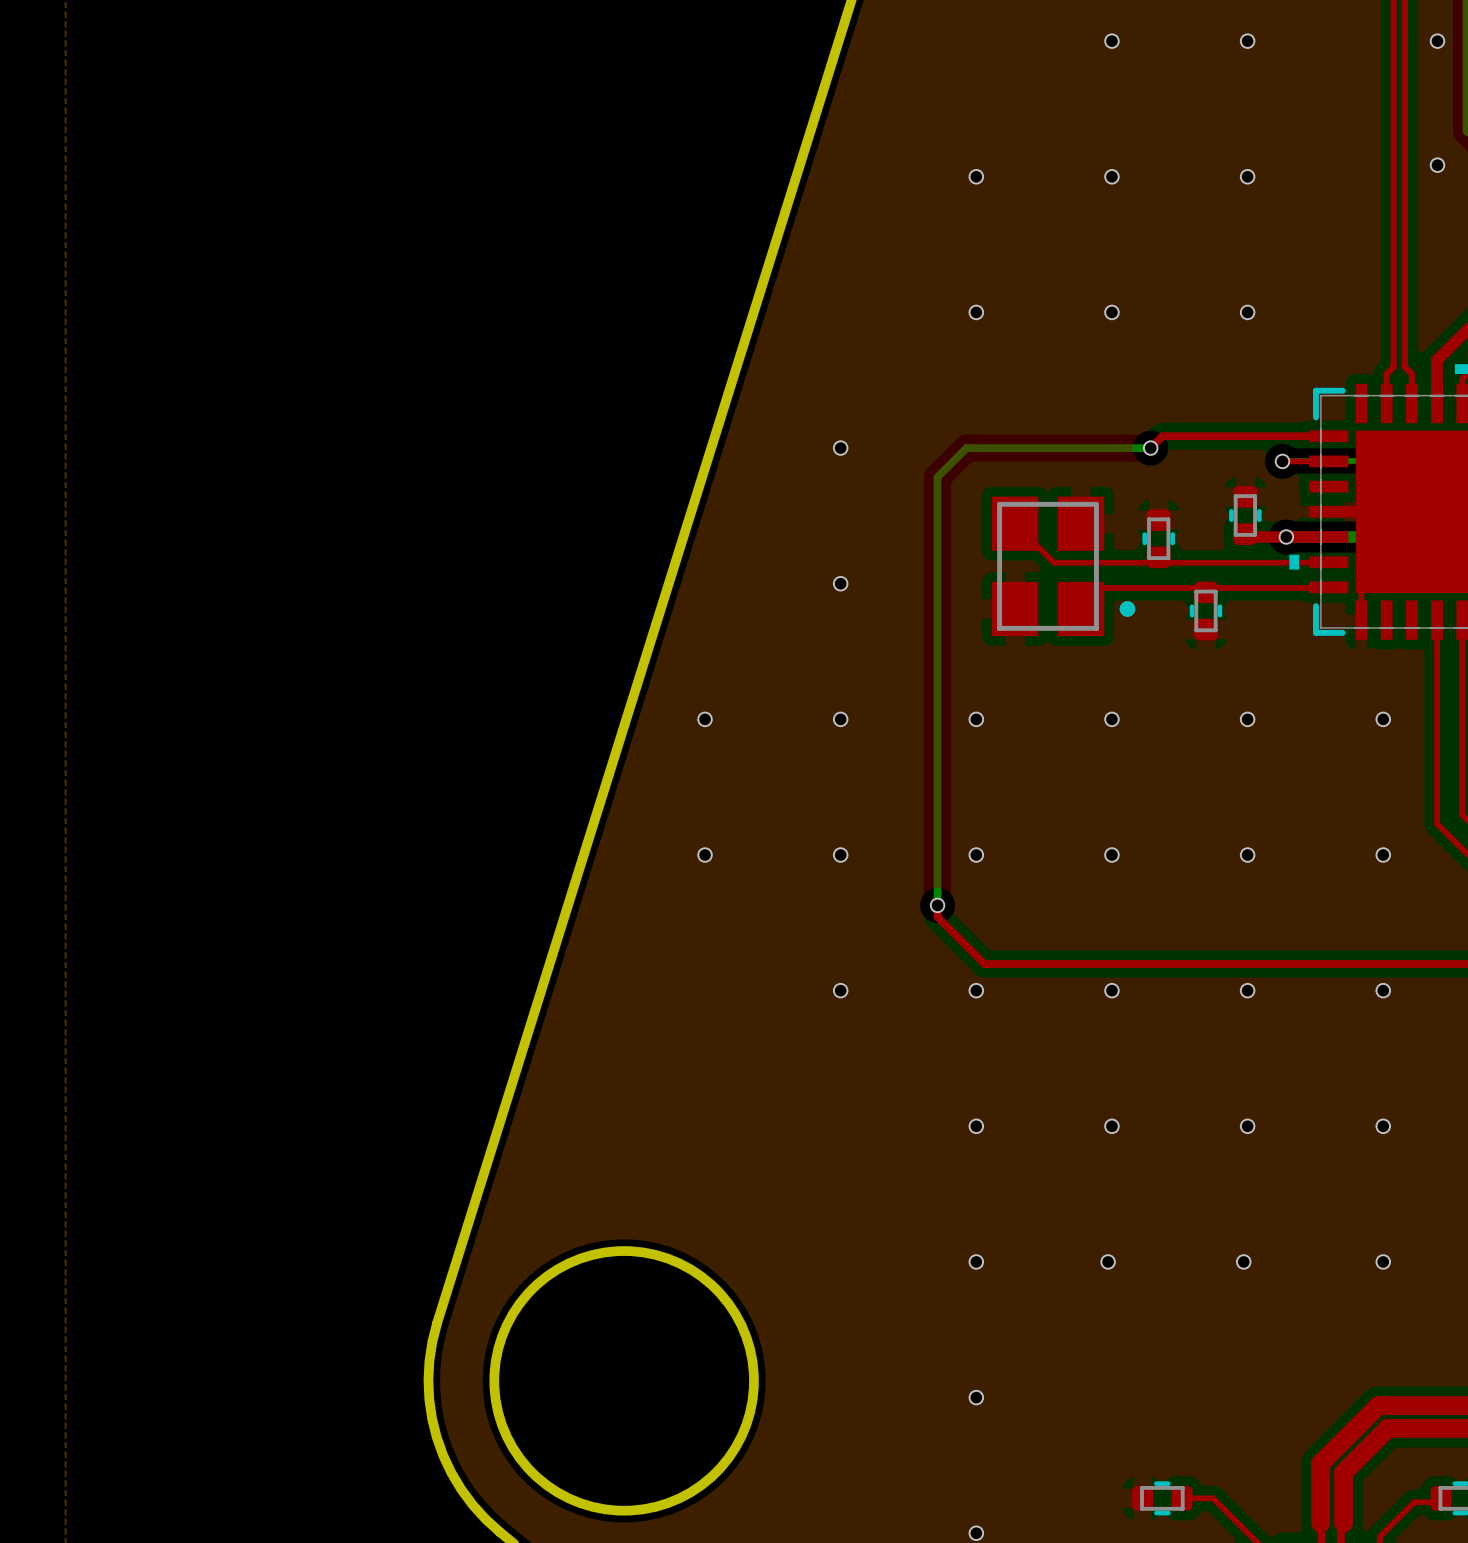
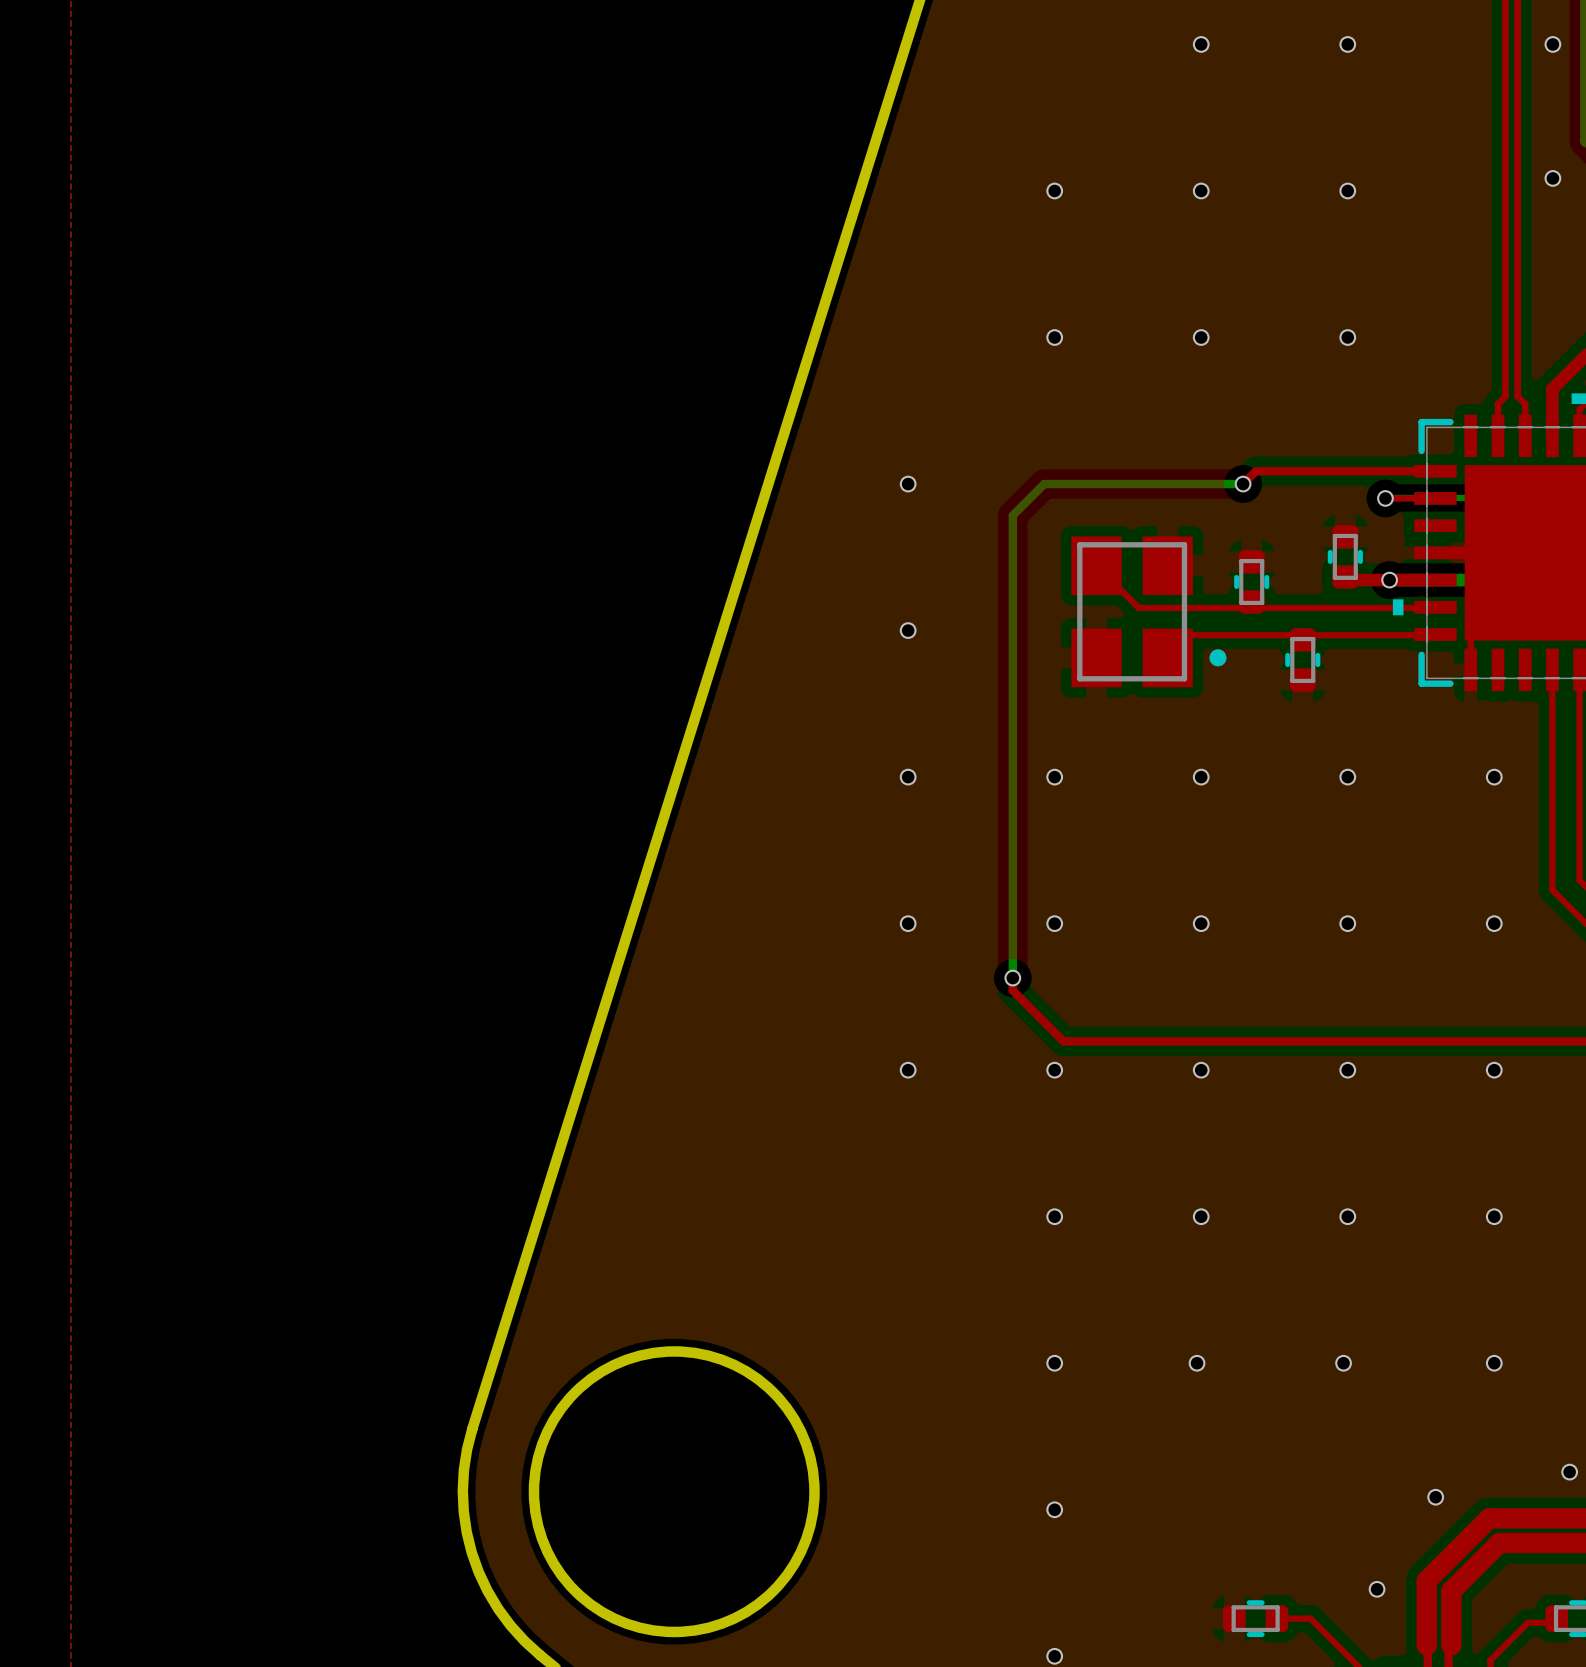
via: (705, 719) -> none
via: (705, 855) -> none
via: none -> (1569, 1472)
via: none -> (1435, 1497)
via: none -> (1377, 1589)

